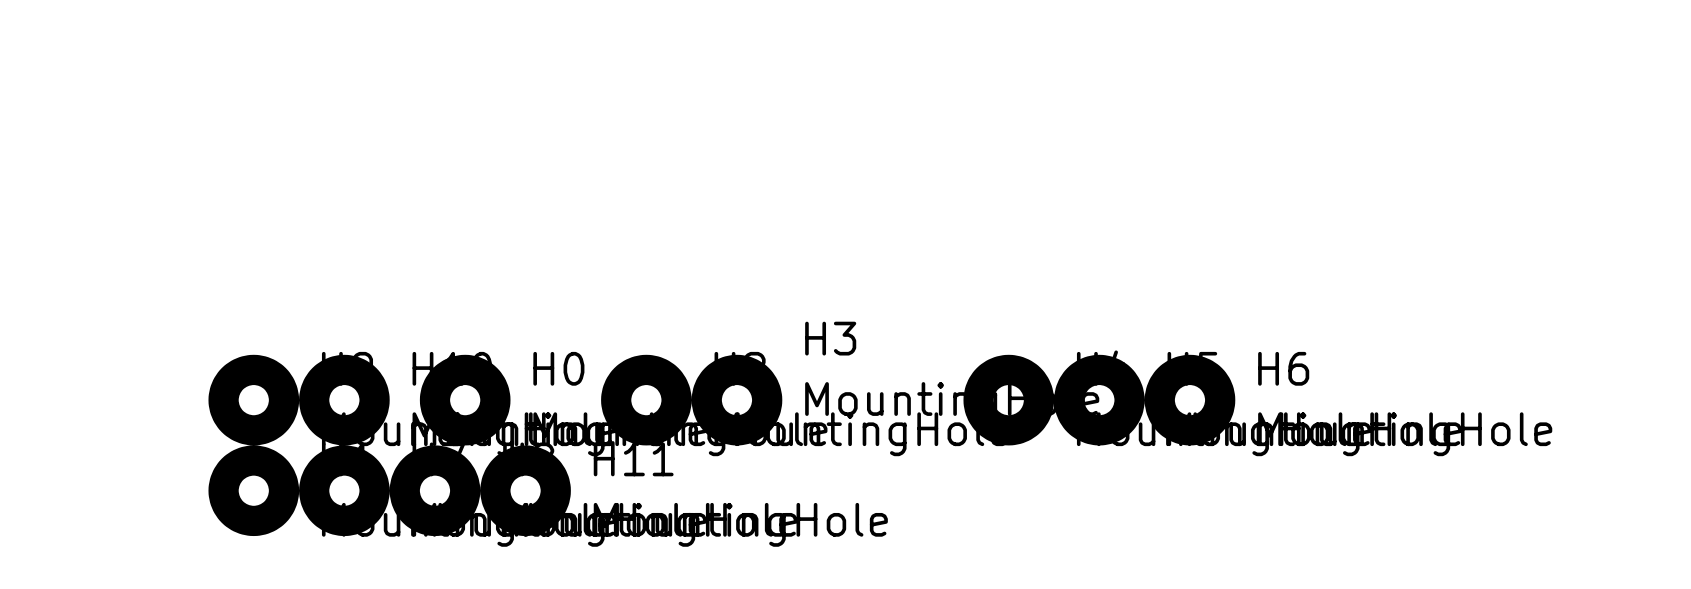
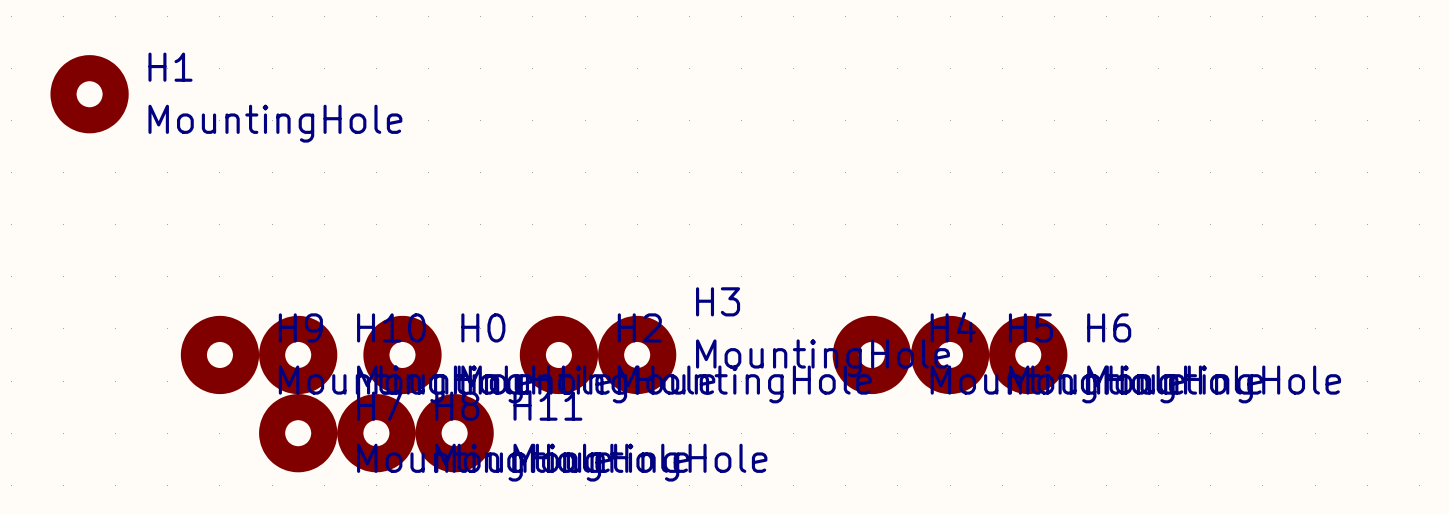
H1 position: (253, 490) -> (89, 94)

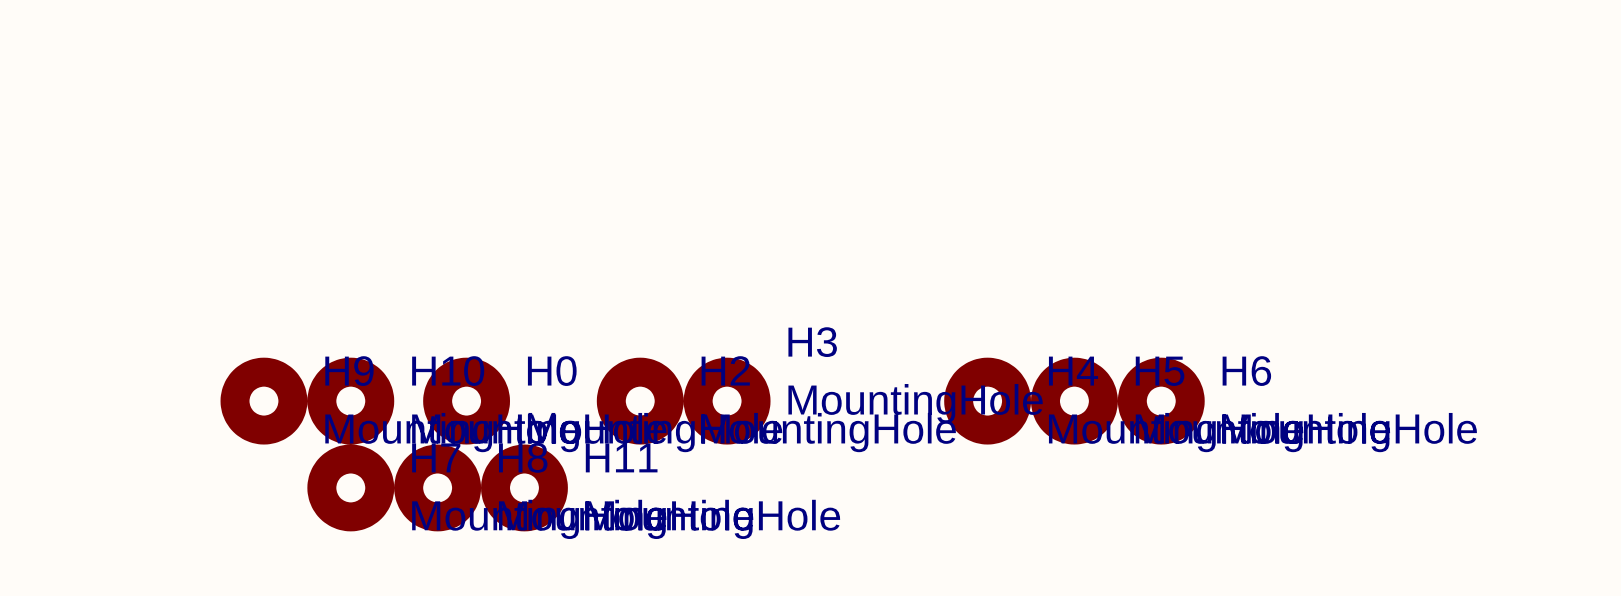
H1: MountingHole (89, 94) -> none

